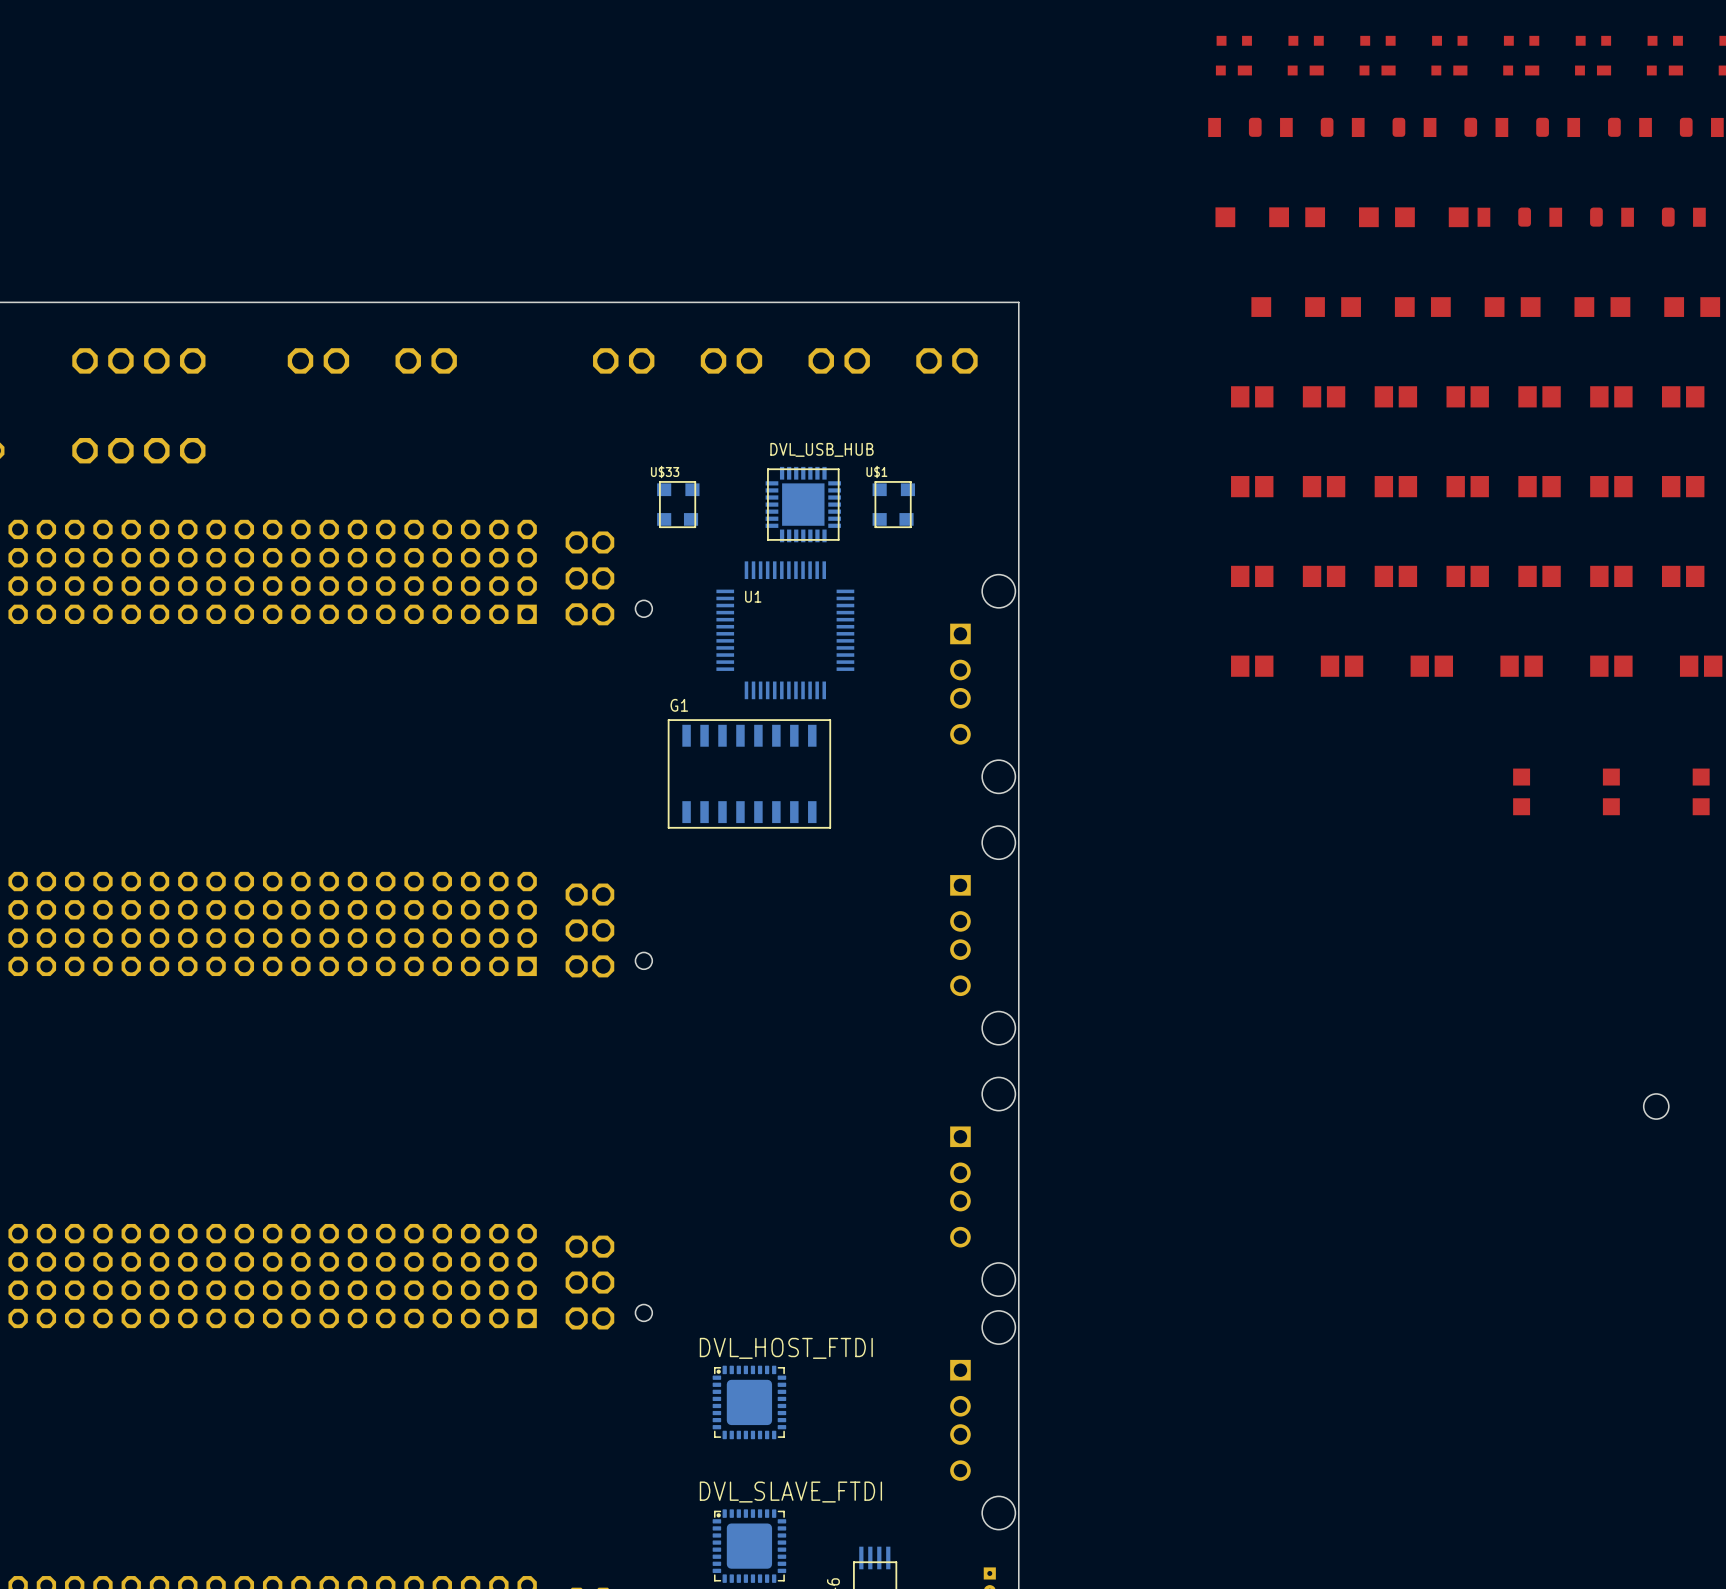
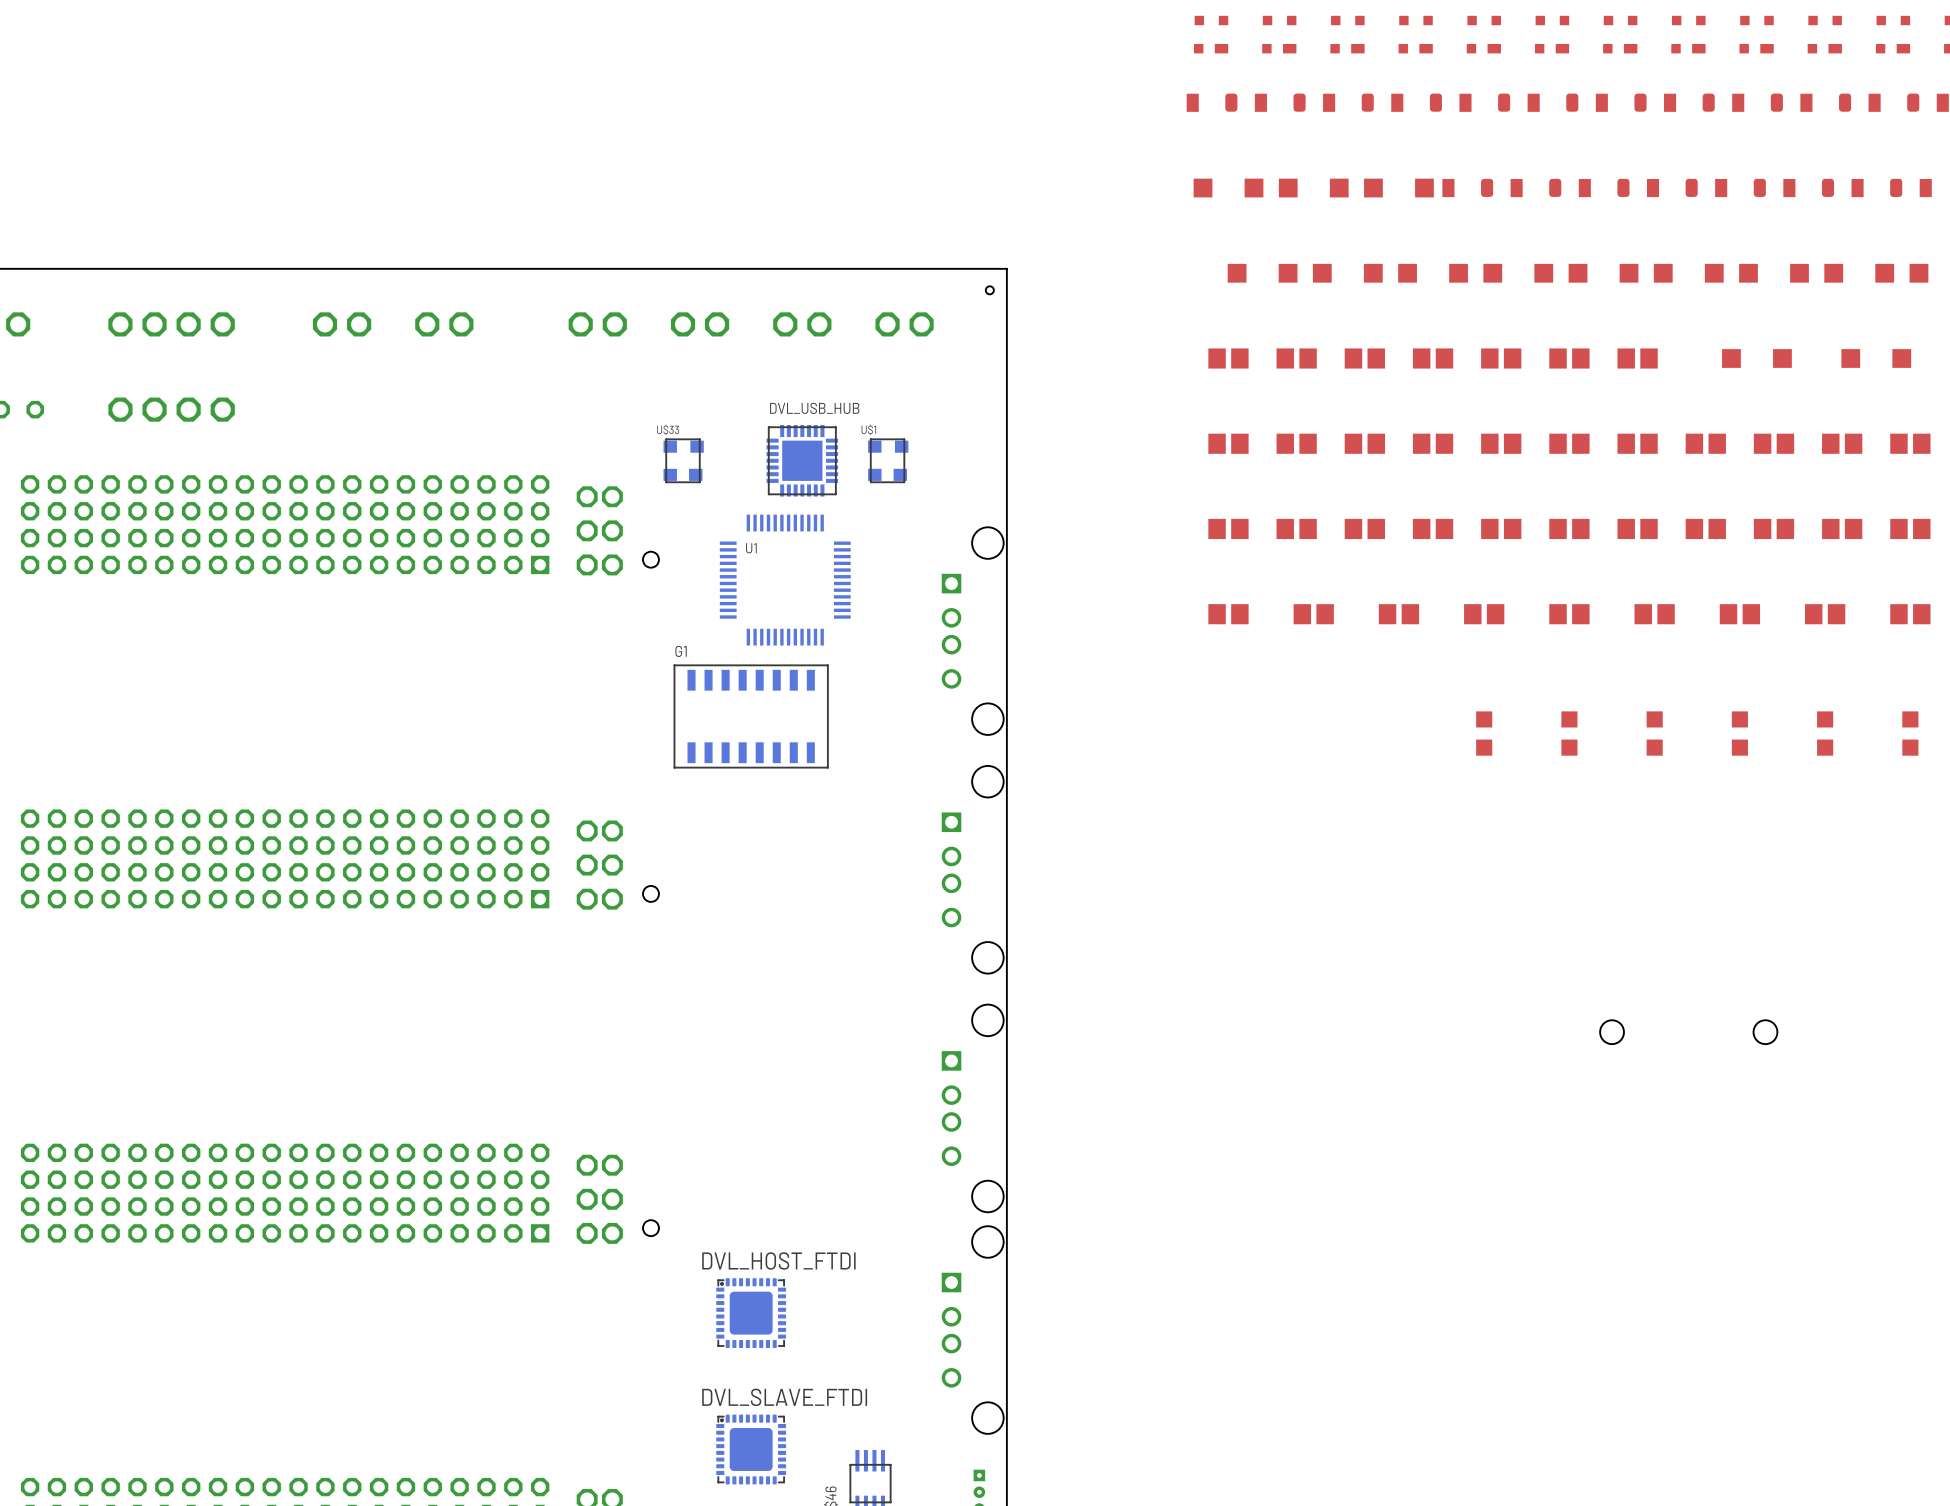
hole: none -> (989, 290)
part: none -> (597, 324)
part: (623, 360) -> none
part: none -> (700, 324)
part: (731, 360) -> none
part: none -> (802, 324)
part: (839, 360) -> none
part: none -> (904, 324)
part: (946, 360) -> none

